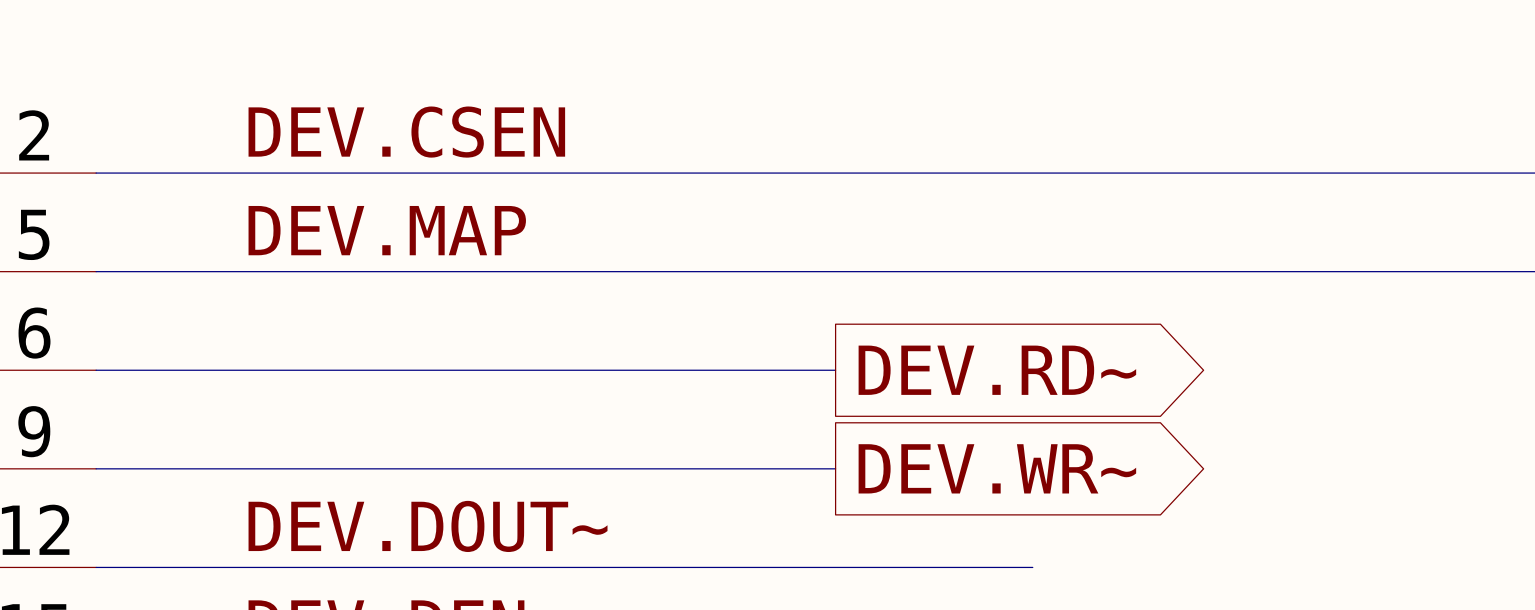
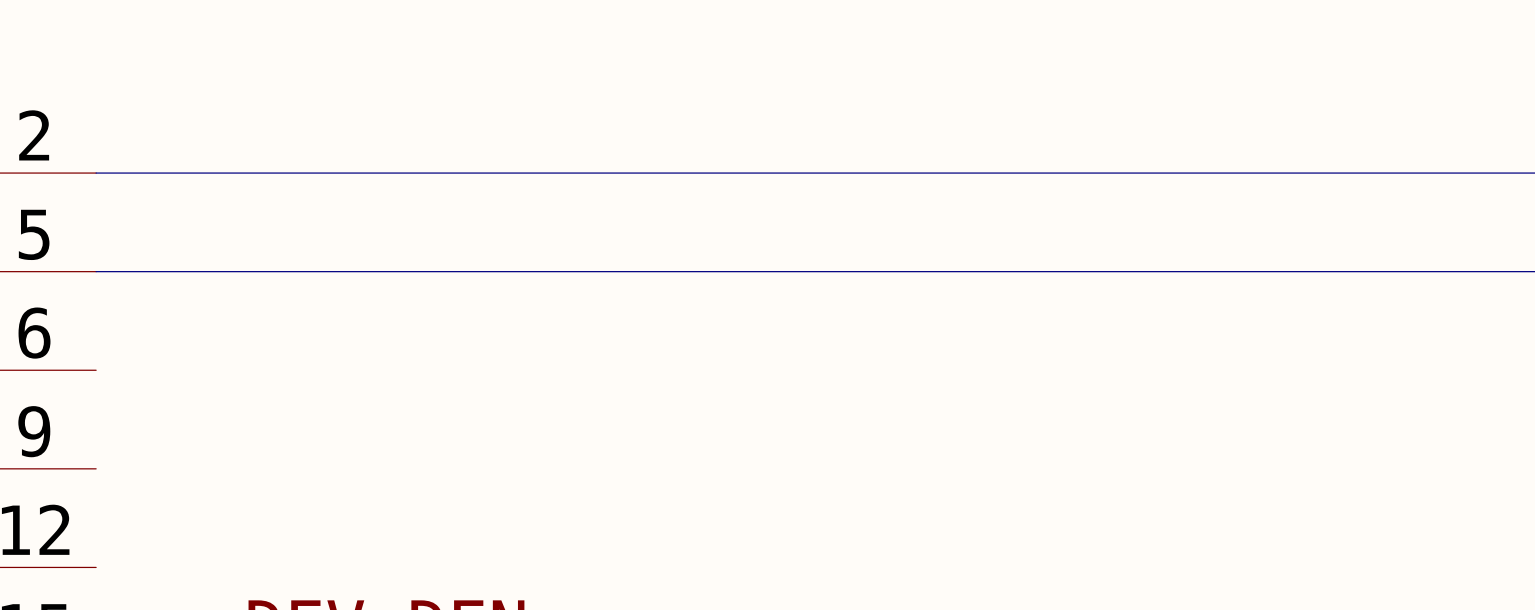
label: DEV.CSEN (406, 132) -> none
label: DEV.MAP (387, 230) -> none
wire: (96, 370) (835, 370) -> none
global label: DEV.RD~ (997, 370) -> none
wire: (96, 468) (835, 468) -> none
global label: DEV.WR~ (997, 468) -> none
label: DEV.DOUT~ (428, 526) -> none
wire: (96, 567) (1032, 567) -> none

